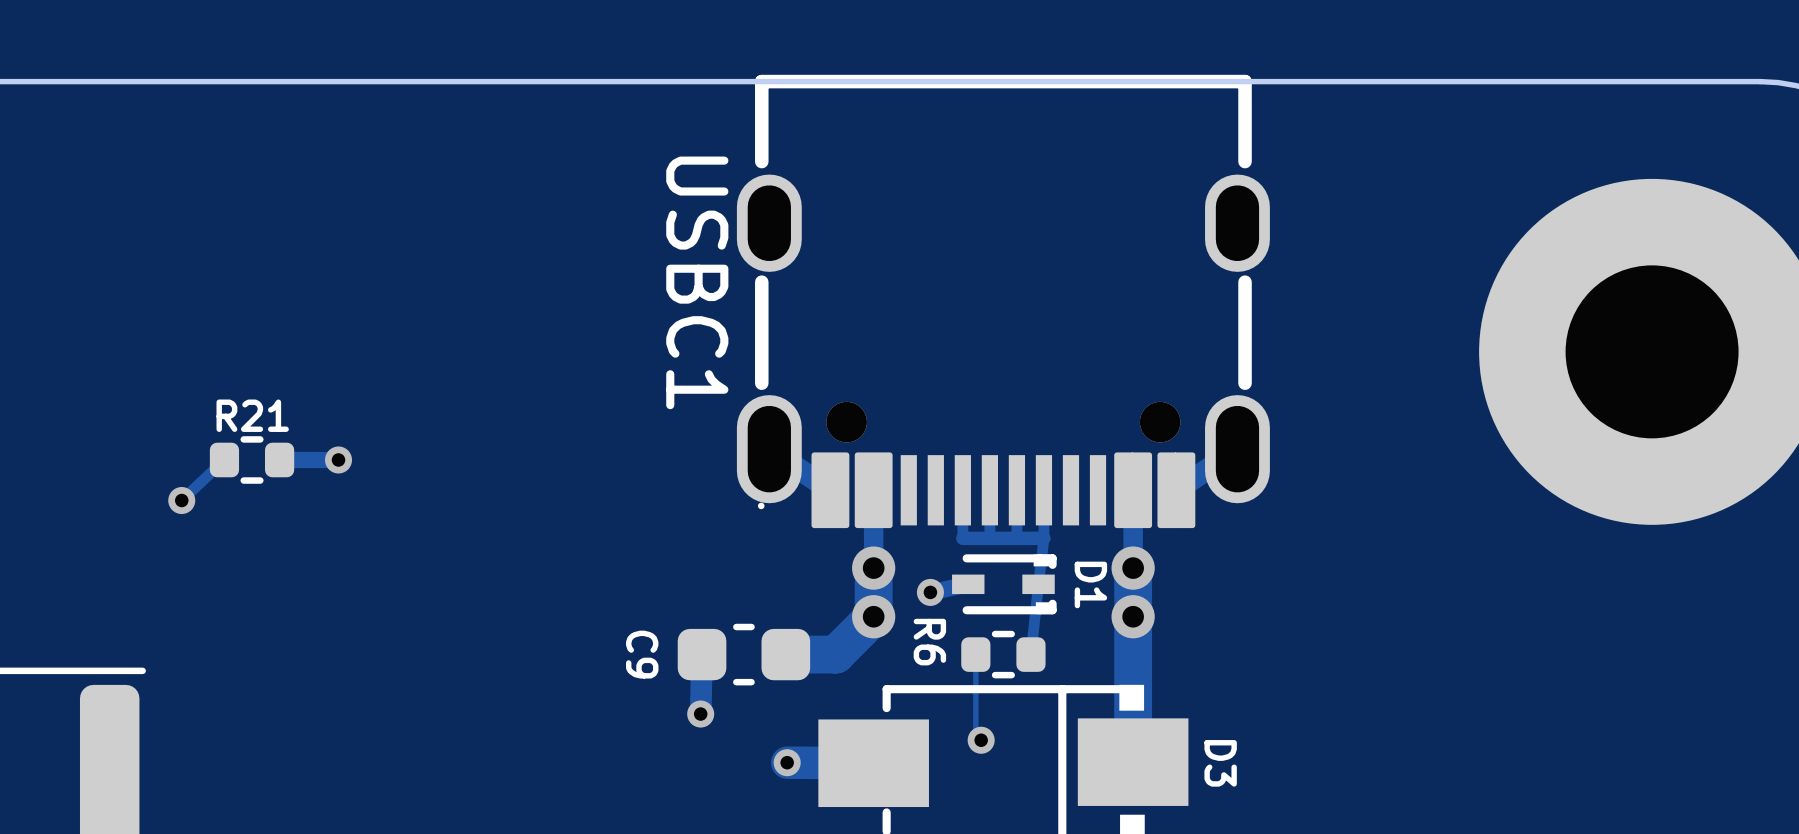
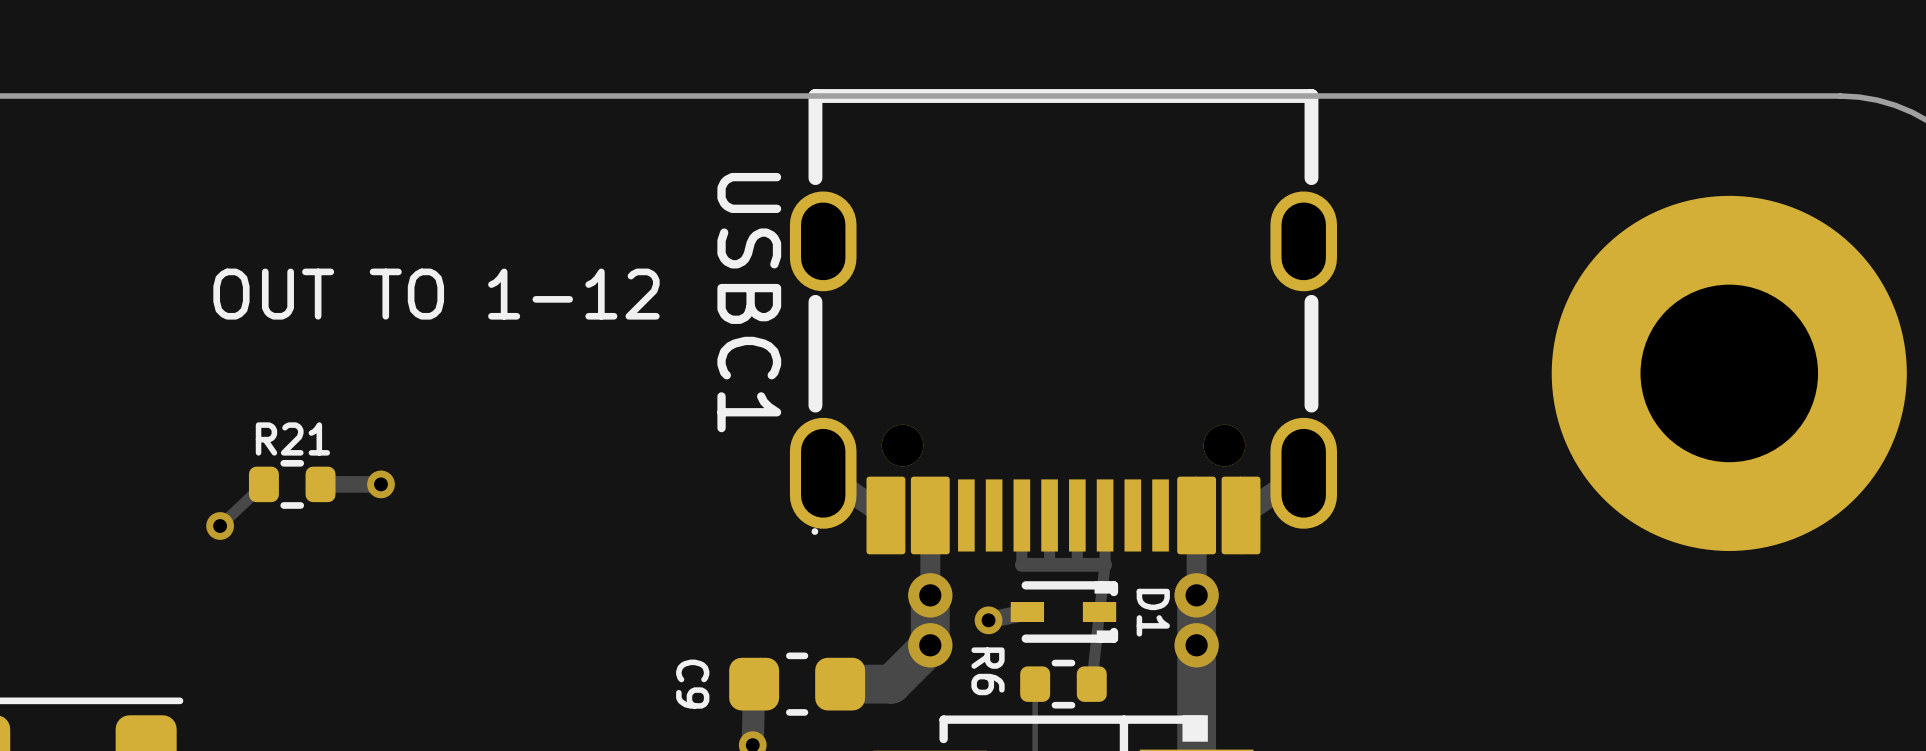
text: none -> OUT TO 1-12 (436, 294)

